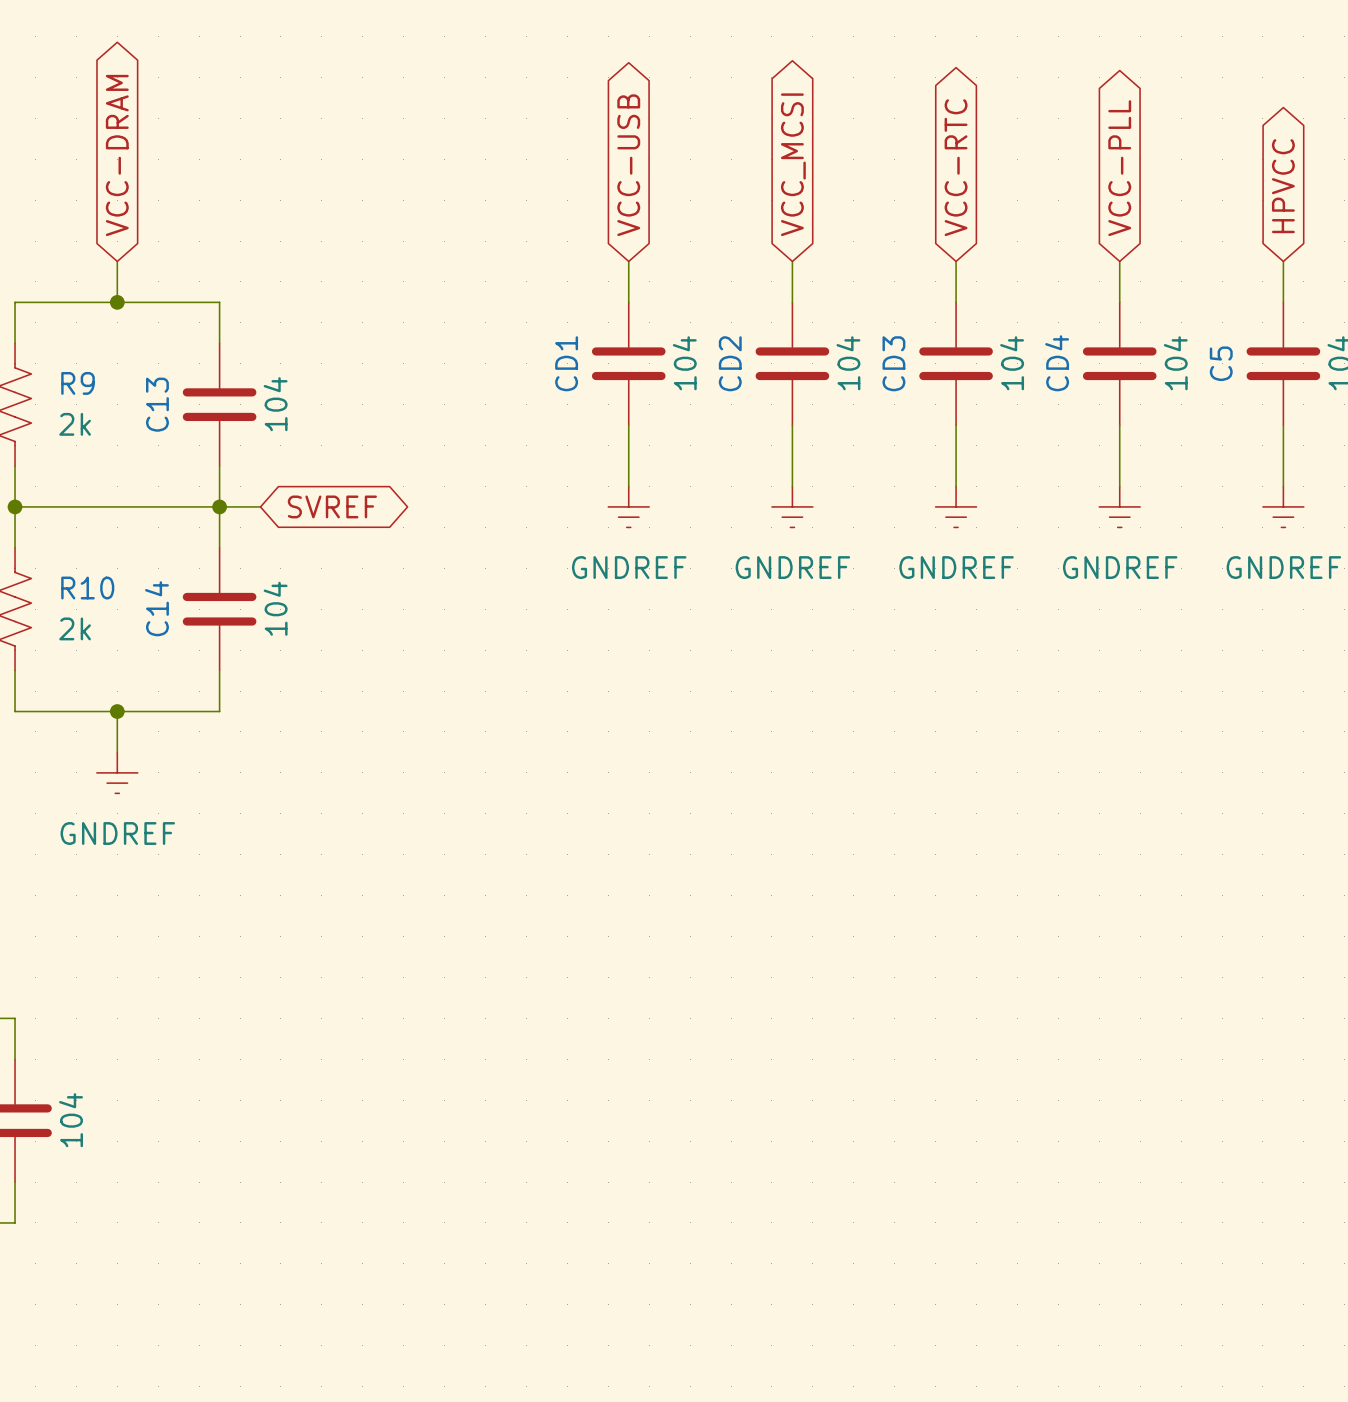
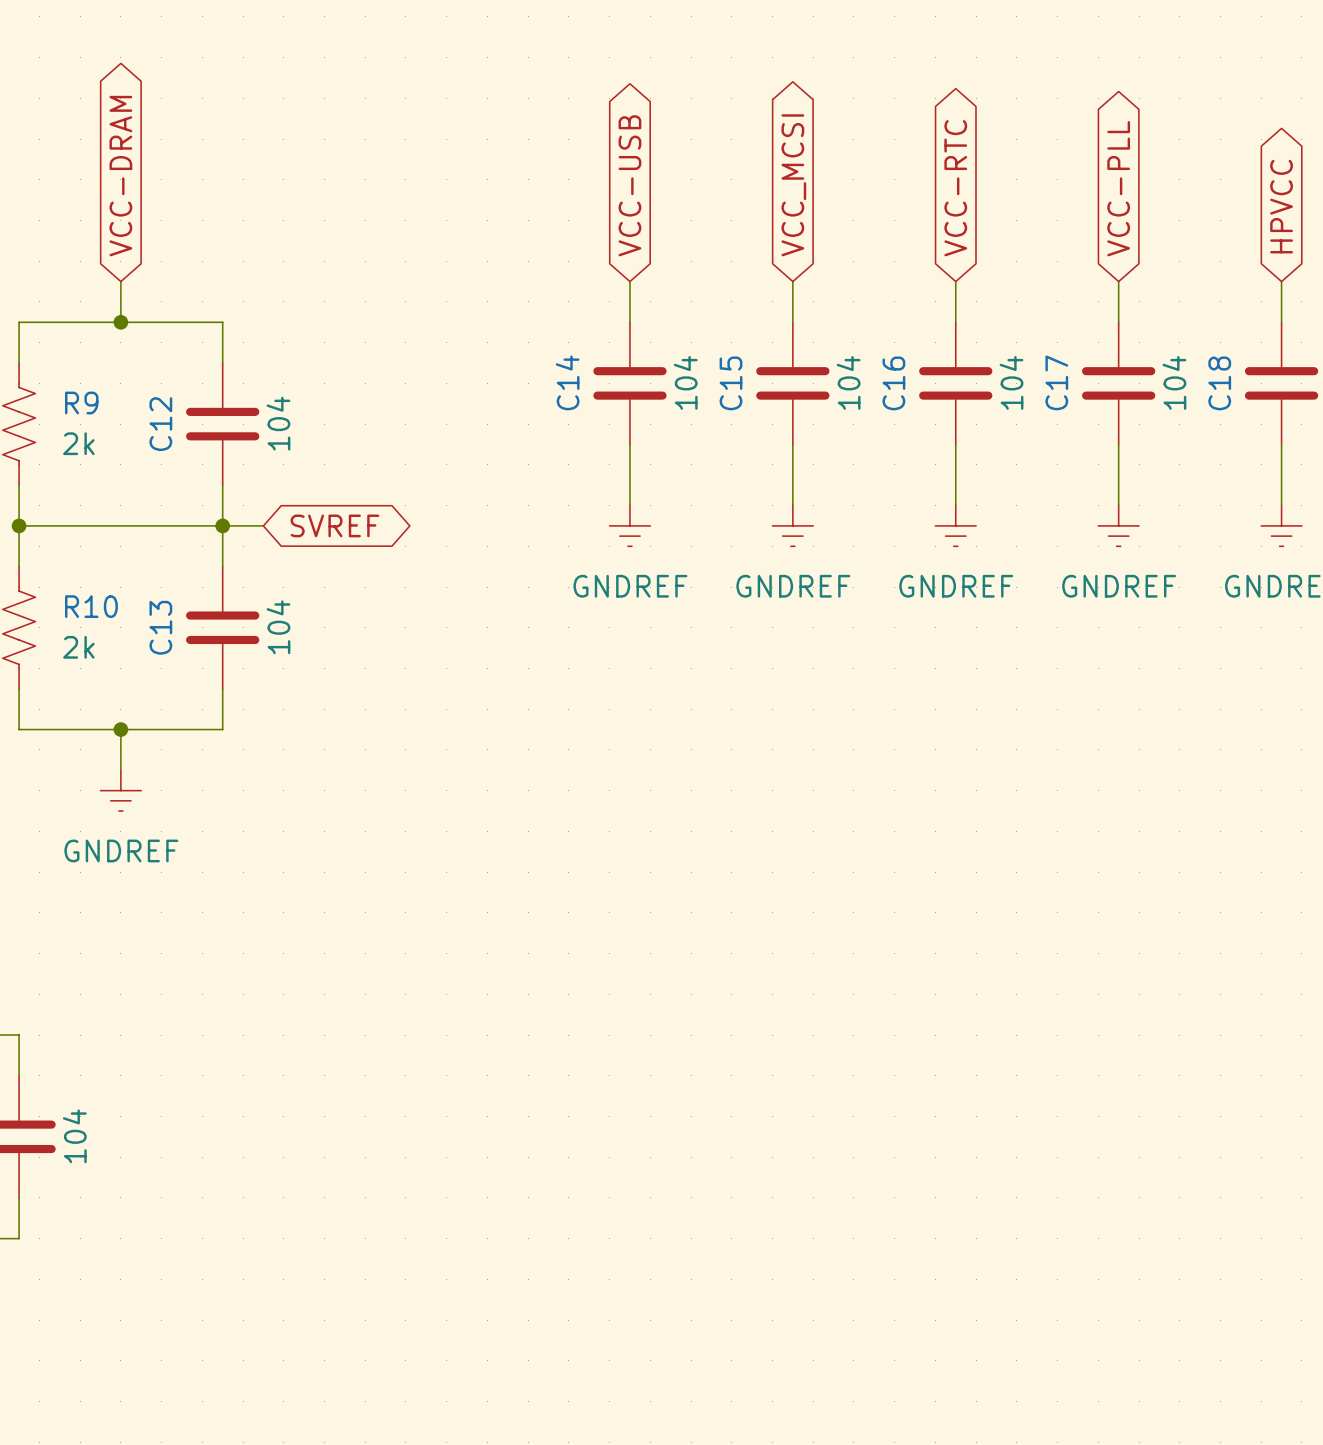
CD1 name: CD1 (566, 363) -> C14 (567, 382)
CD2 name: CD2 (730, 363) -> C15 (731, 383)
CD3 name: CD3 (893, 363) -> C16 (893, 383)
CD4 name: CD4 (1057, 363) -> C17 (1056, 382)
C5 name: C5 (1221, 363) -> C18 (1219, 383)
C13 name: C13 (157, 404) -> C12 (160, 424)
C14 name: C14 (156, 608) -> C13 (160, 627)

